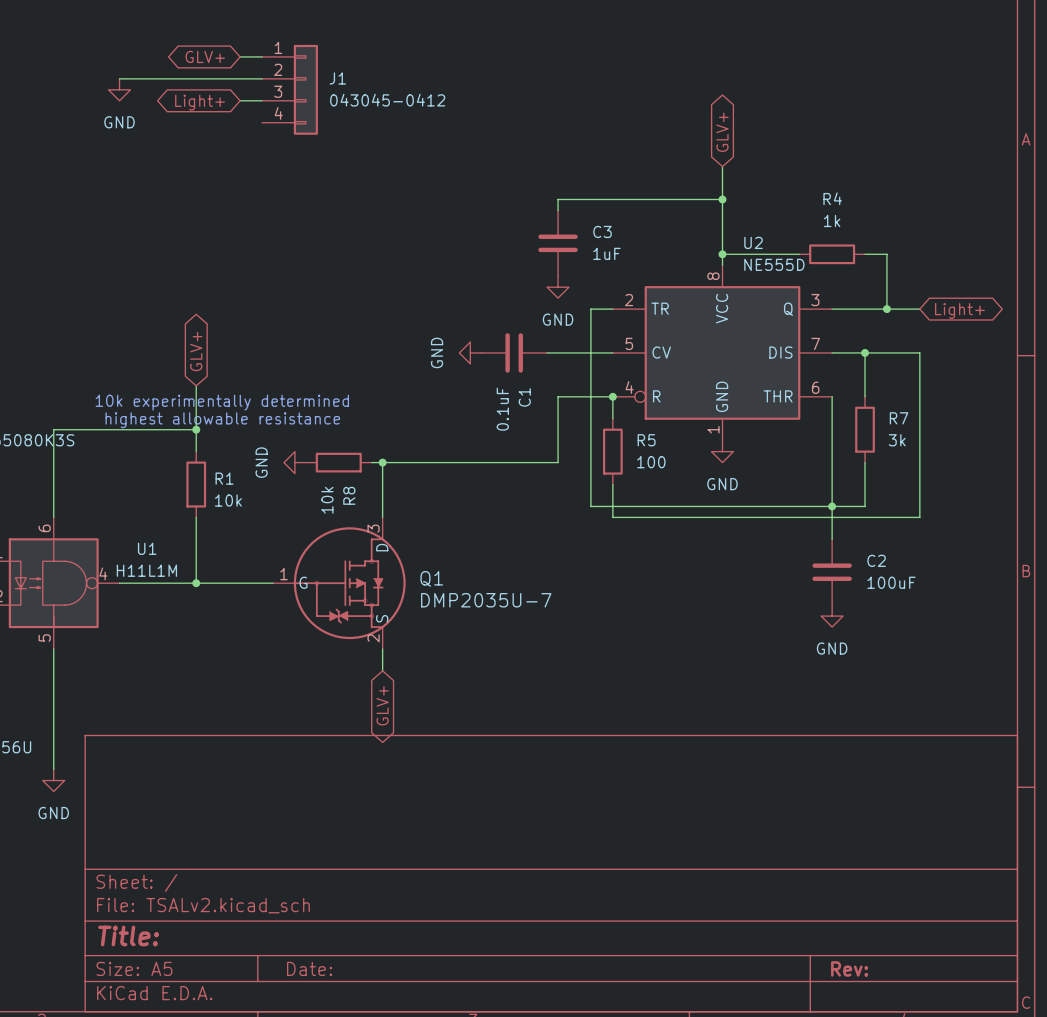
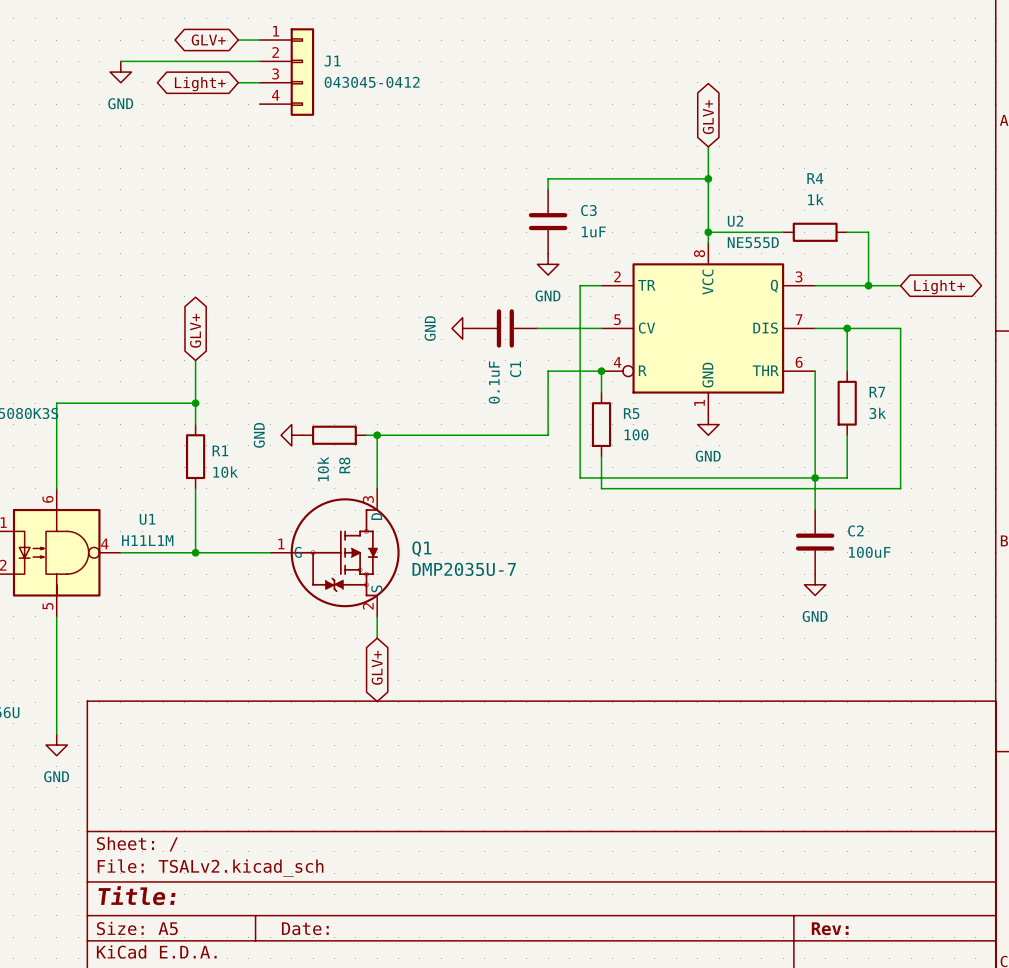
text: 10k experimentally determined (222, 402) -> none
text: highest allowable resistance (222, 420) -> none

